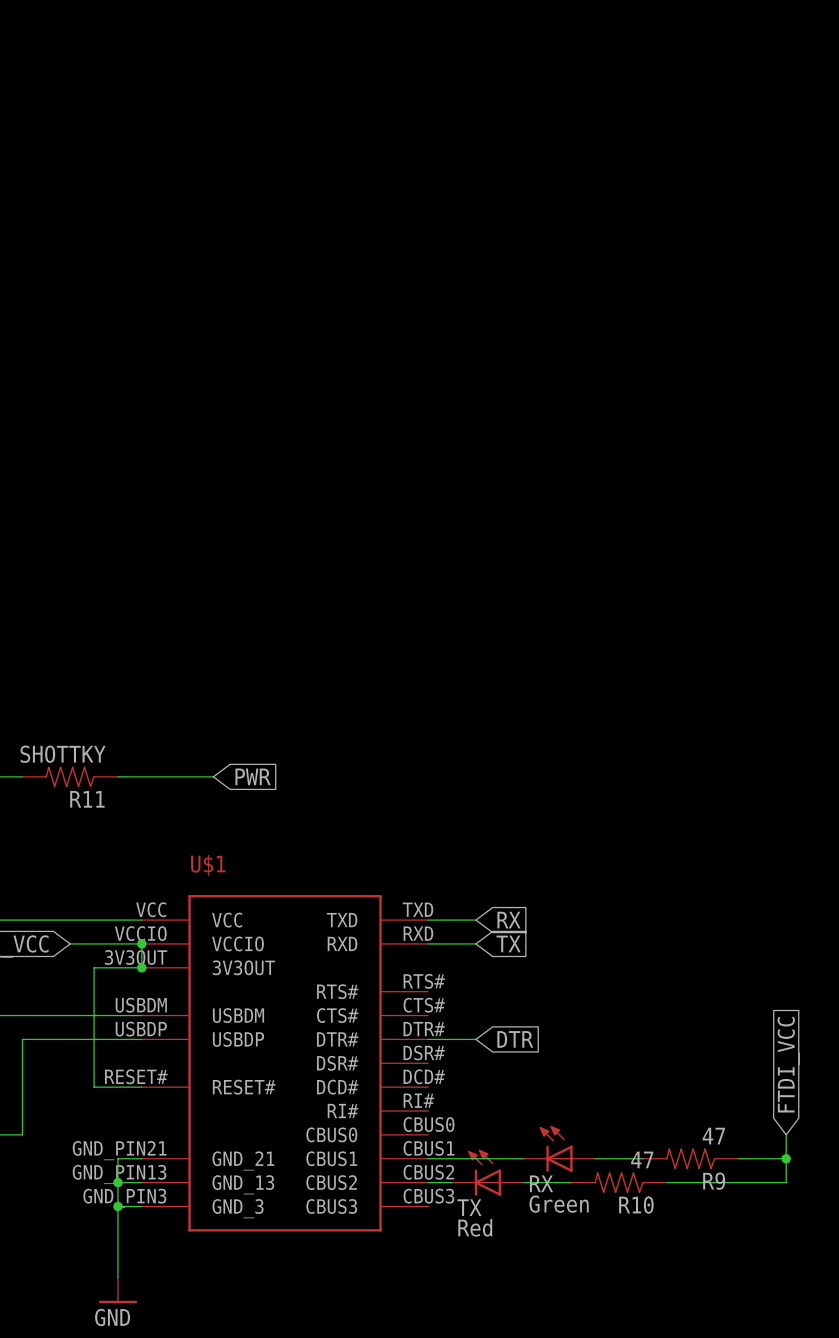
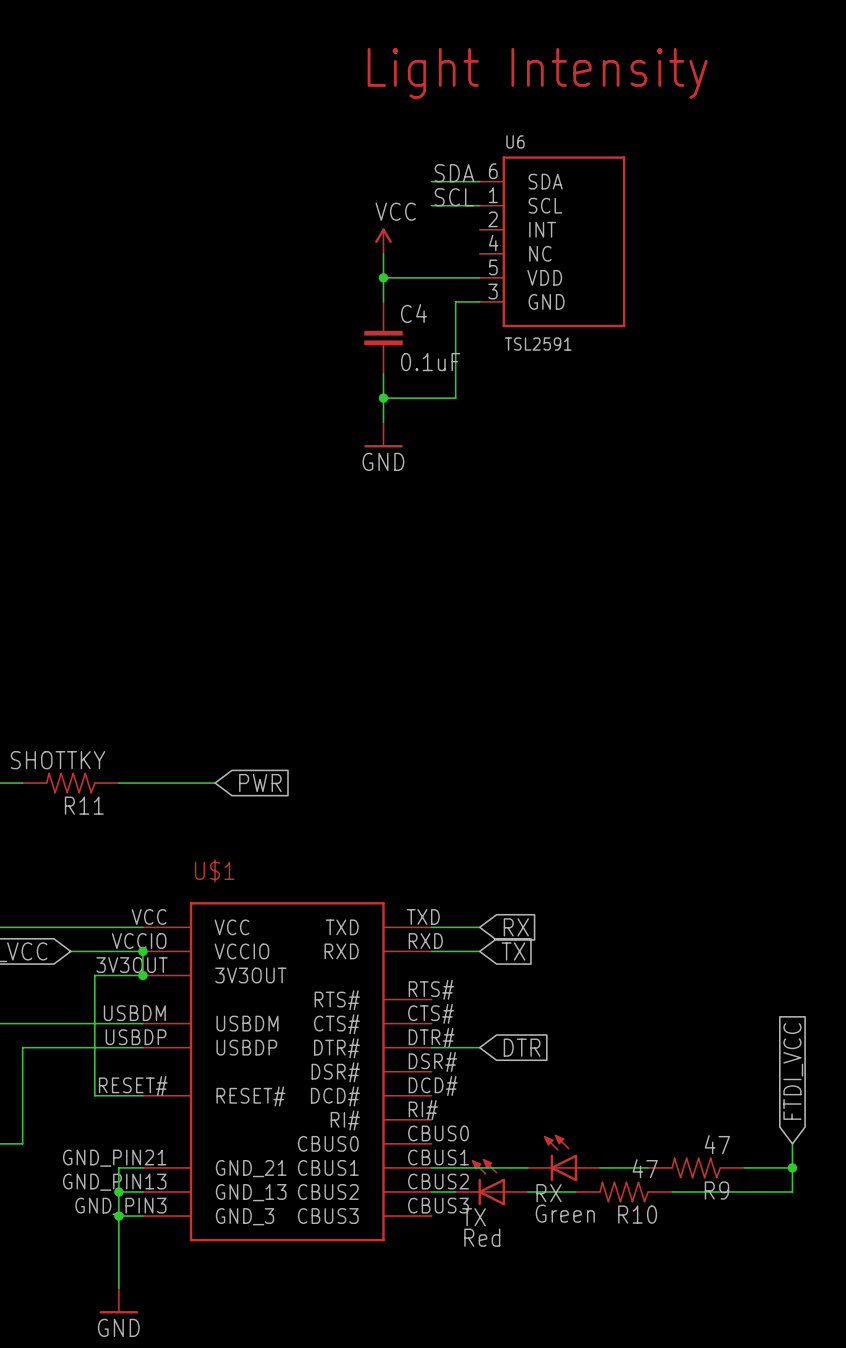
text: none -> Light Intensity (537, 73)
label: none -> SDA (454, 173)
wire: none -> (431, 181) (479, 181)
label: none -> SCL (454, 197)
wire: none -> (431, 205) (479, 205)
power symbol: none -> VCC (383, 241)
U6: none -> TSL2591 (552, 241)
wire: none -> (383, 253) (383, 301)
wire: none -> (383, 277) (479, 277)
junction: none -> (383, 277)
wire: none -> (479, 301) (455, 301) (455, 398) (383, 398)
C4: none -> 0.1uF (383, 338)
wire: none -> (383, 374) (383, 422)
junction: none -> (383, 398)
power symbol: none -> GND (383, 434)

